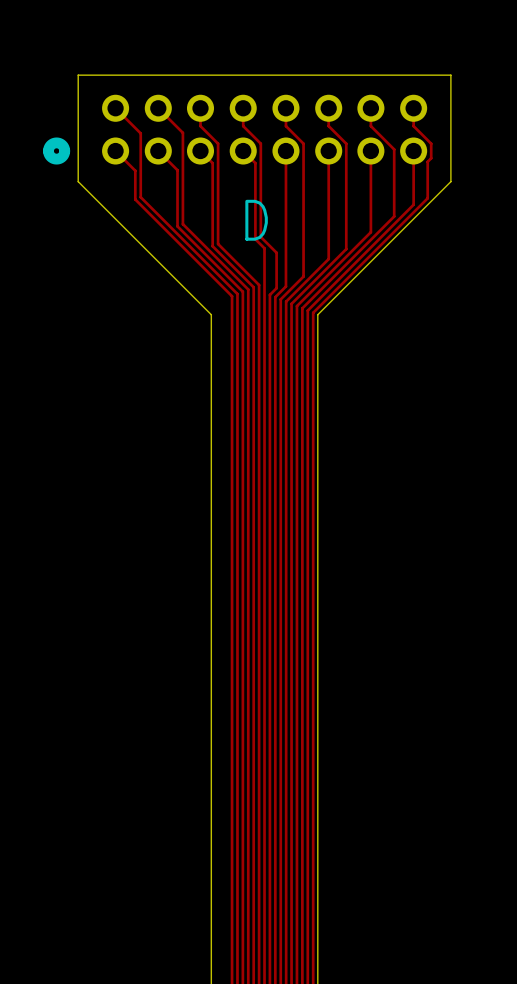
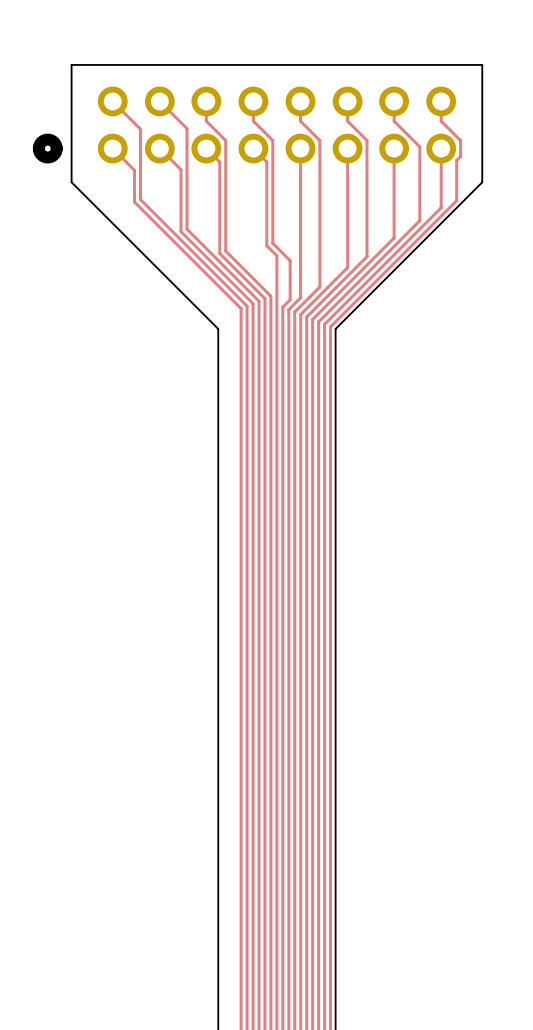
text: D (256, 220) -> none

